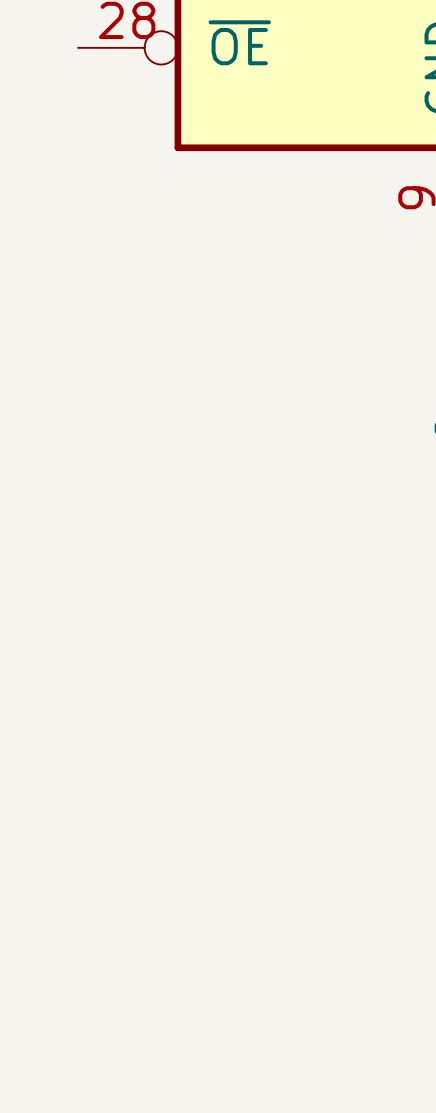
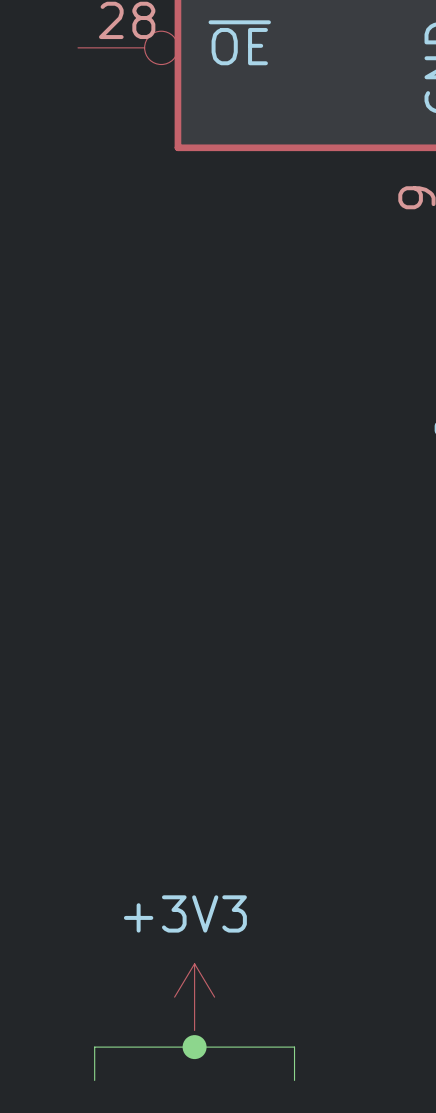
power symbol: none -> +3V3 (194, 997)
junction: none -> (194, 1047)
wire: none -> (94, 1080) (94, 1047) (294, 1047) (294, 1080)

